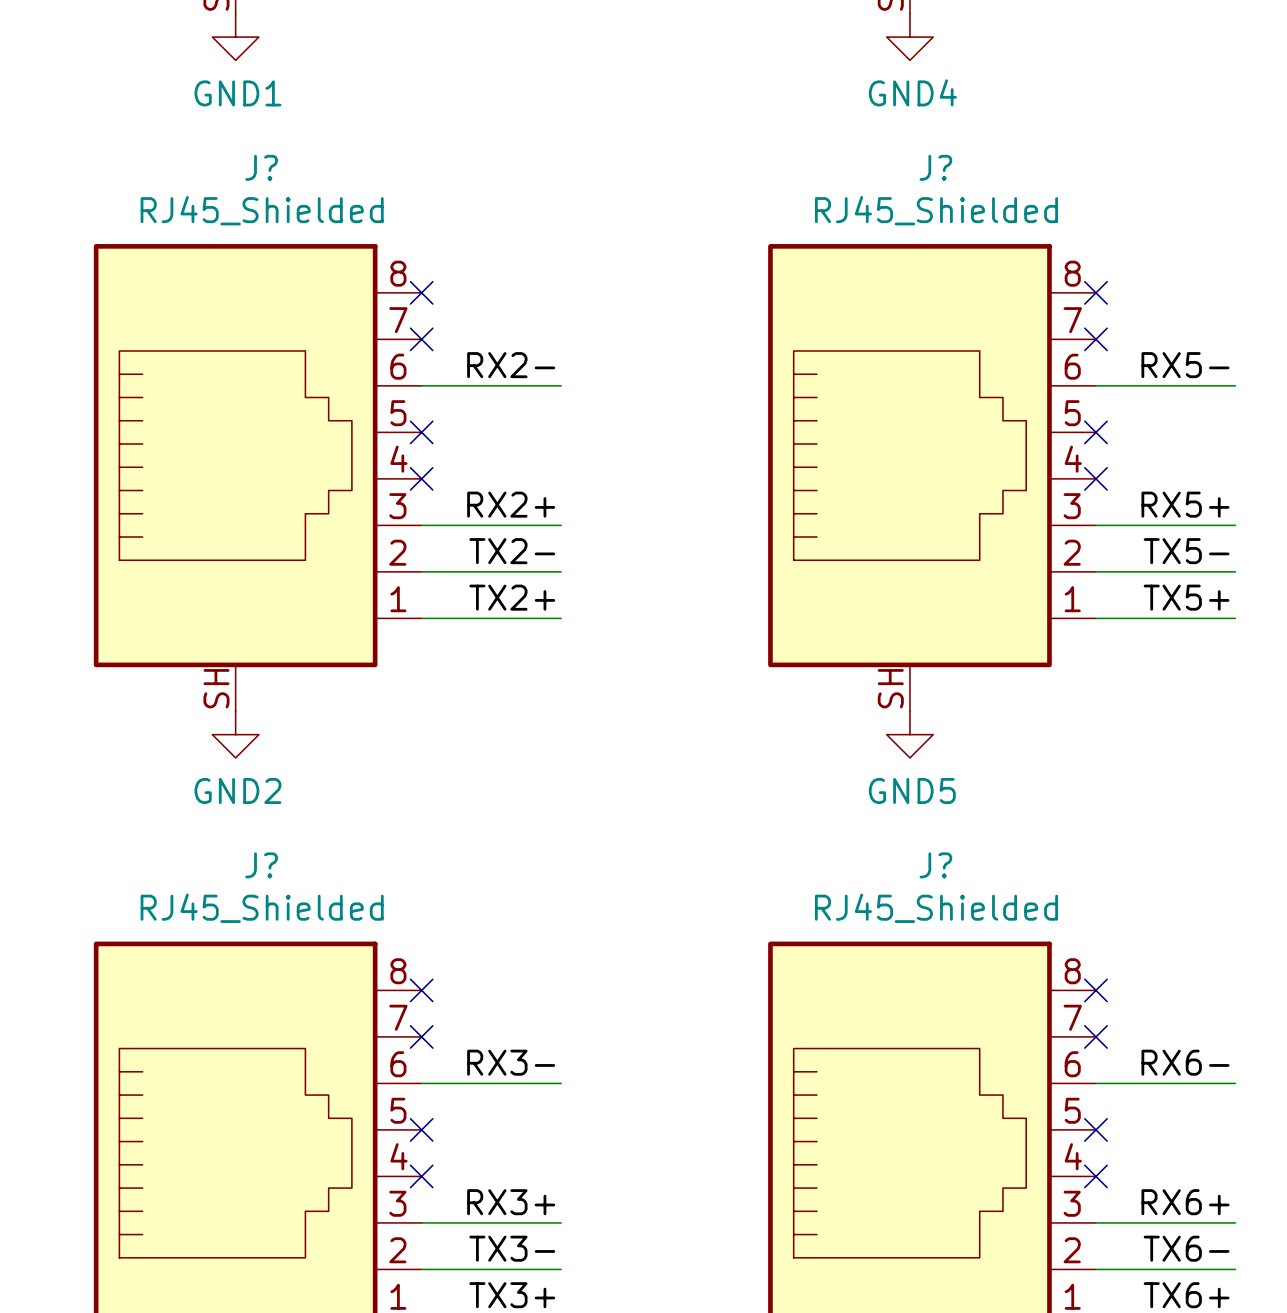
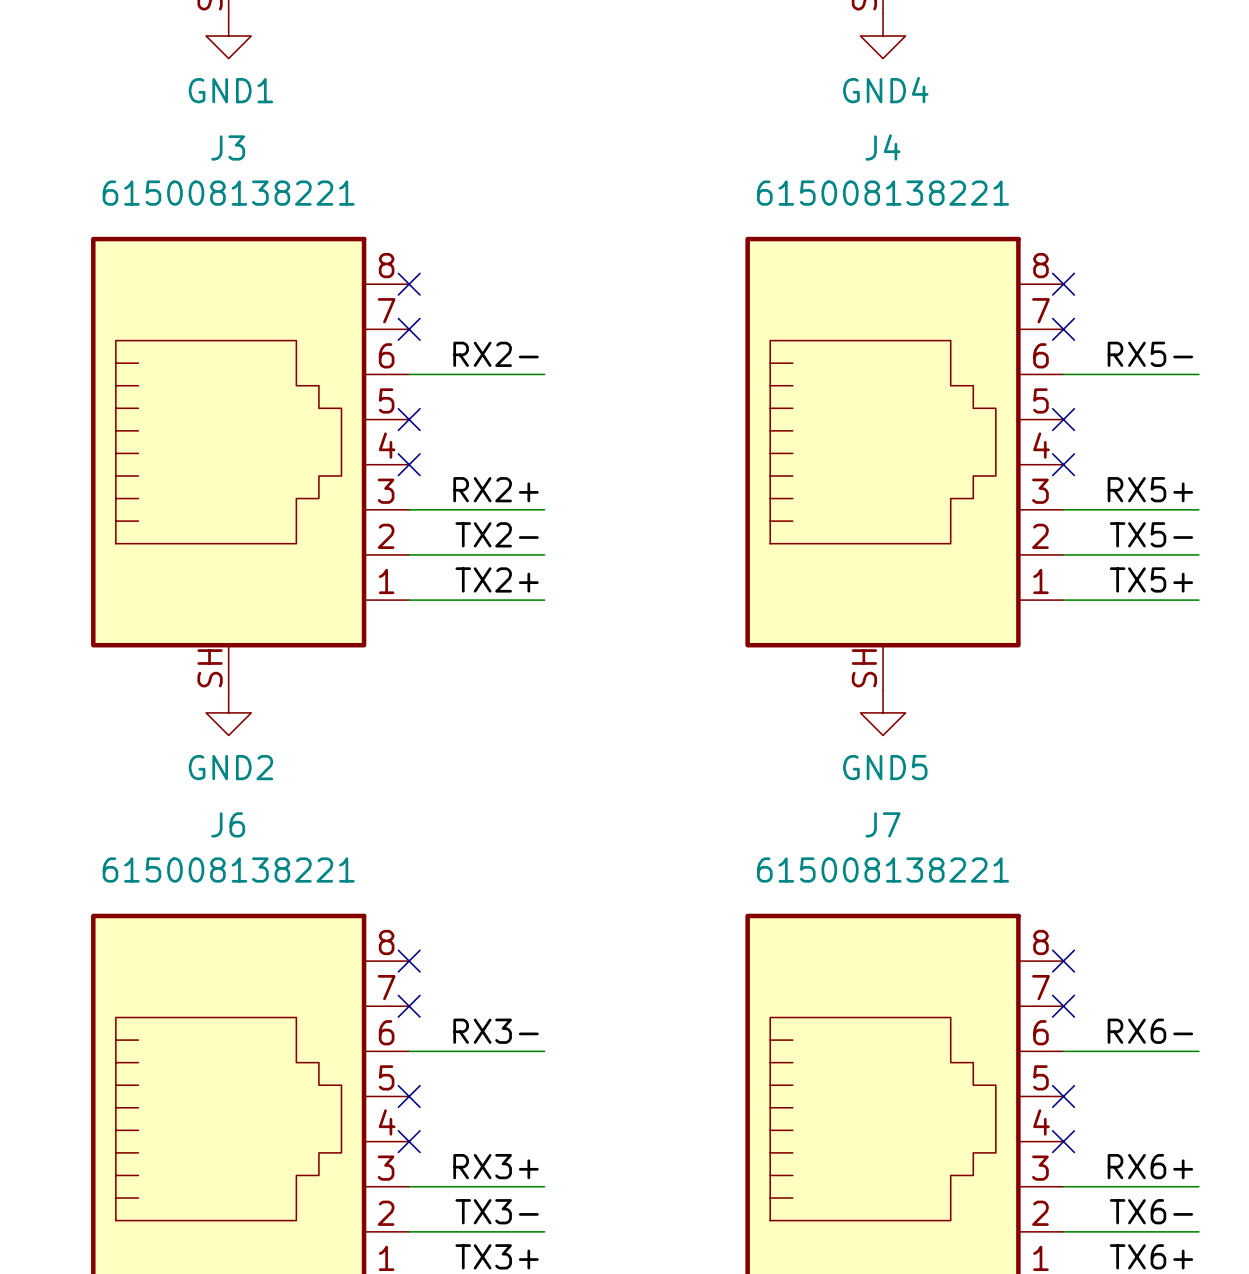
J? name: J? (261, 167) -> J3 (228, 147)
J? name: J? (935, 167) -> J4 (883, 147)
J? value: RJ45_Shielded (262, 210) -> 615008138221 (228, 193)
J? value: RJ45_Shielded (936, 210) -> 615008138221 (883, 193)
J? name: J? (261, 865) -> J6 (228, 824)
J? name: J? (935, 865) -> J7 (883, 824)
J? value: RJ45_Shielded (262, 908) -> 615008138221 (228, 870)
J? value: RJ45_Shielded (936, 908) -> 615008138221 (883, 870)

